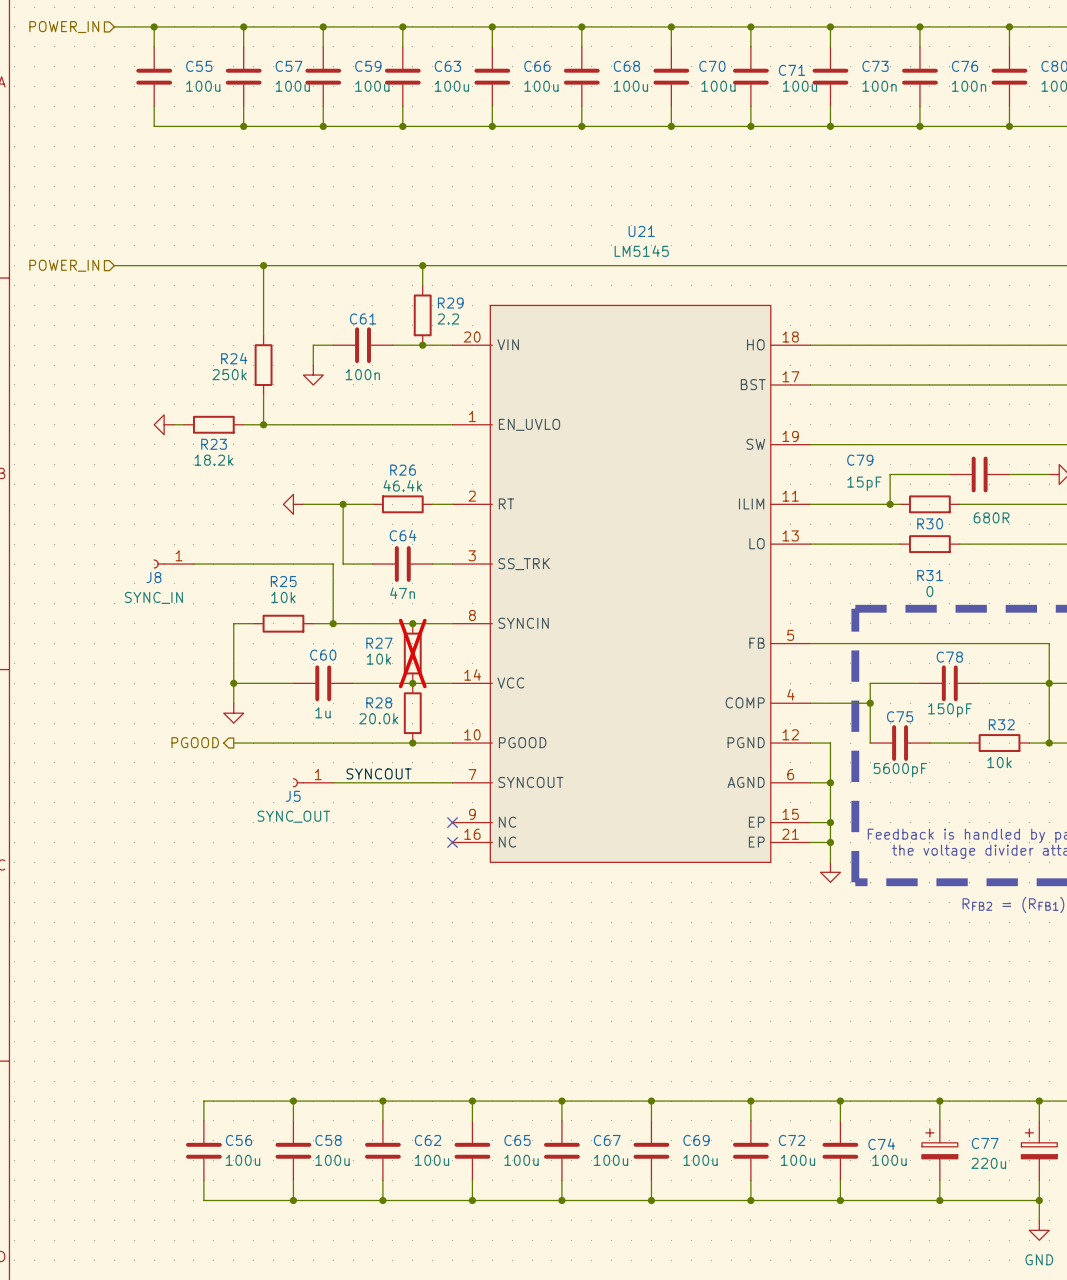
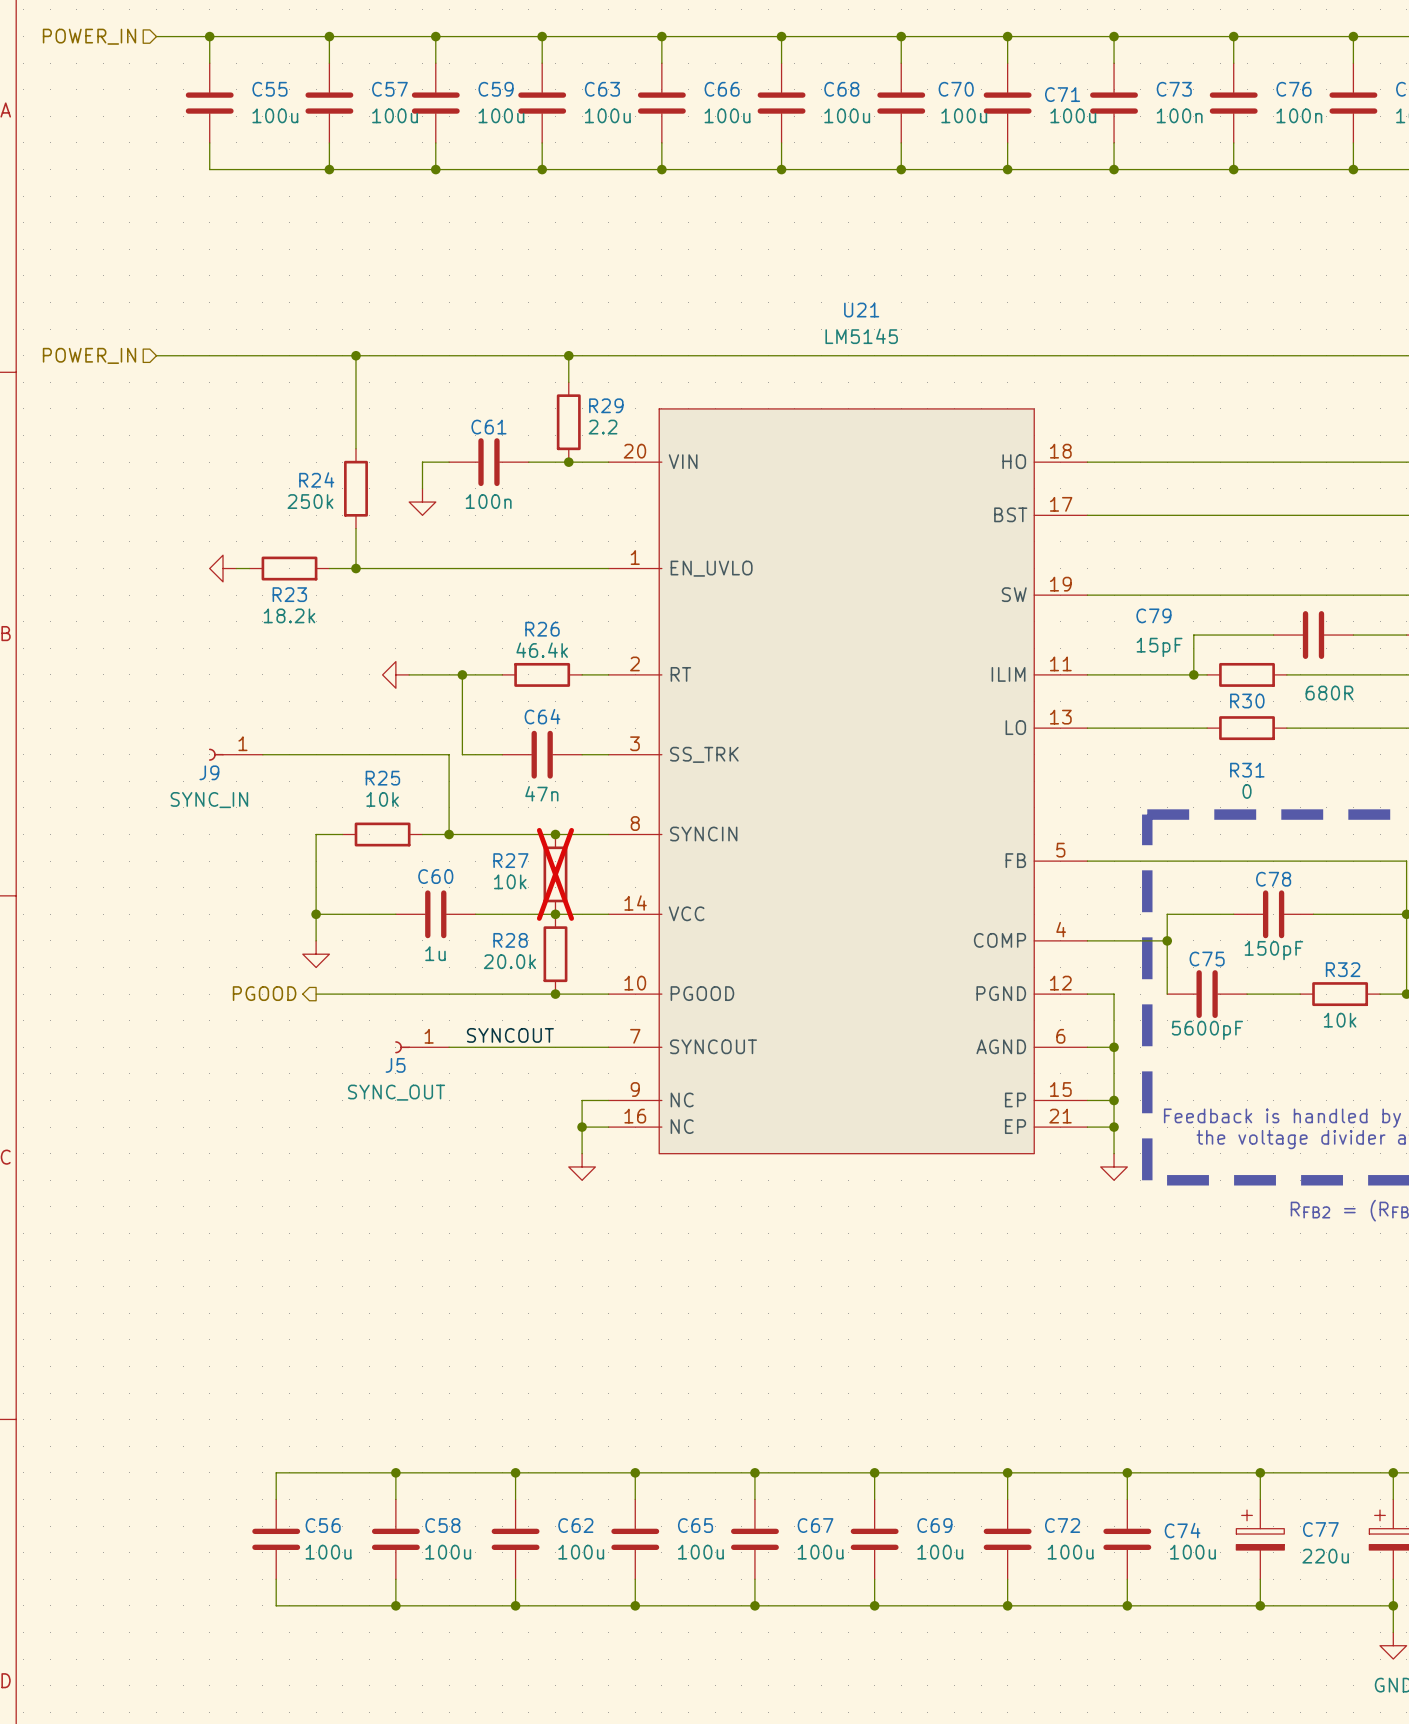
J8 name: J8 (153, 577) -> J9 (209, 772)
wire: none -> (608, 1100) (582, 1100) (582, 1153)
no-connect mark: (452, 822) -> none
wire: none -> (582, 1127) (608, 1127)
junction: none -> (582, 1127)
no-connect mark: (452, 842) -> none
power symbol: none -> (582, 1166)

